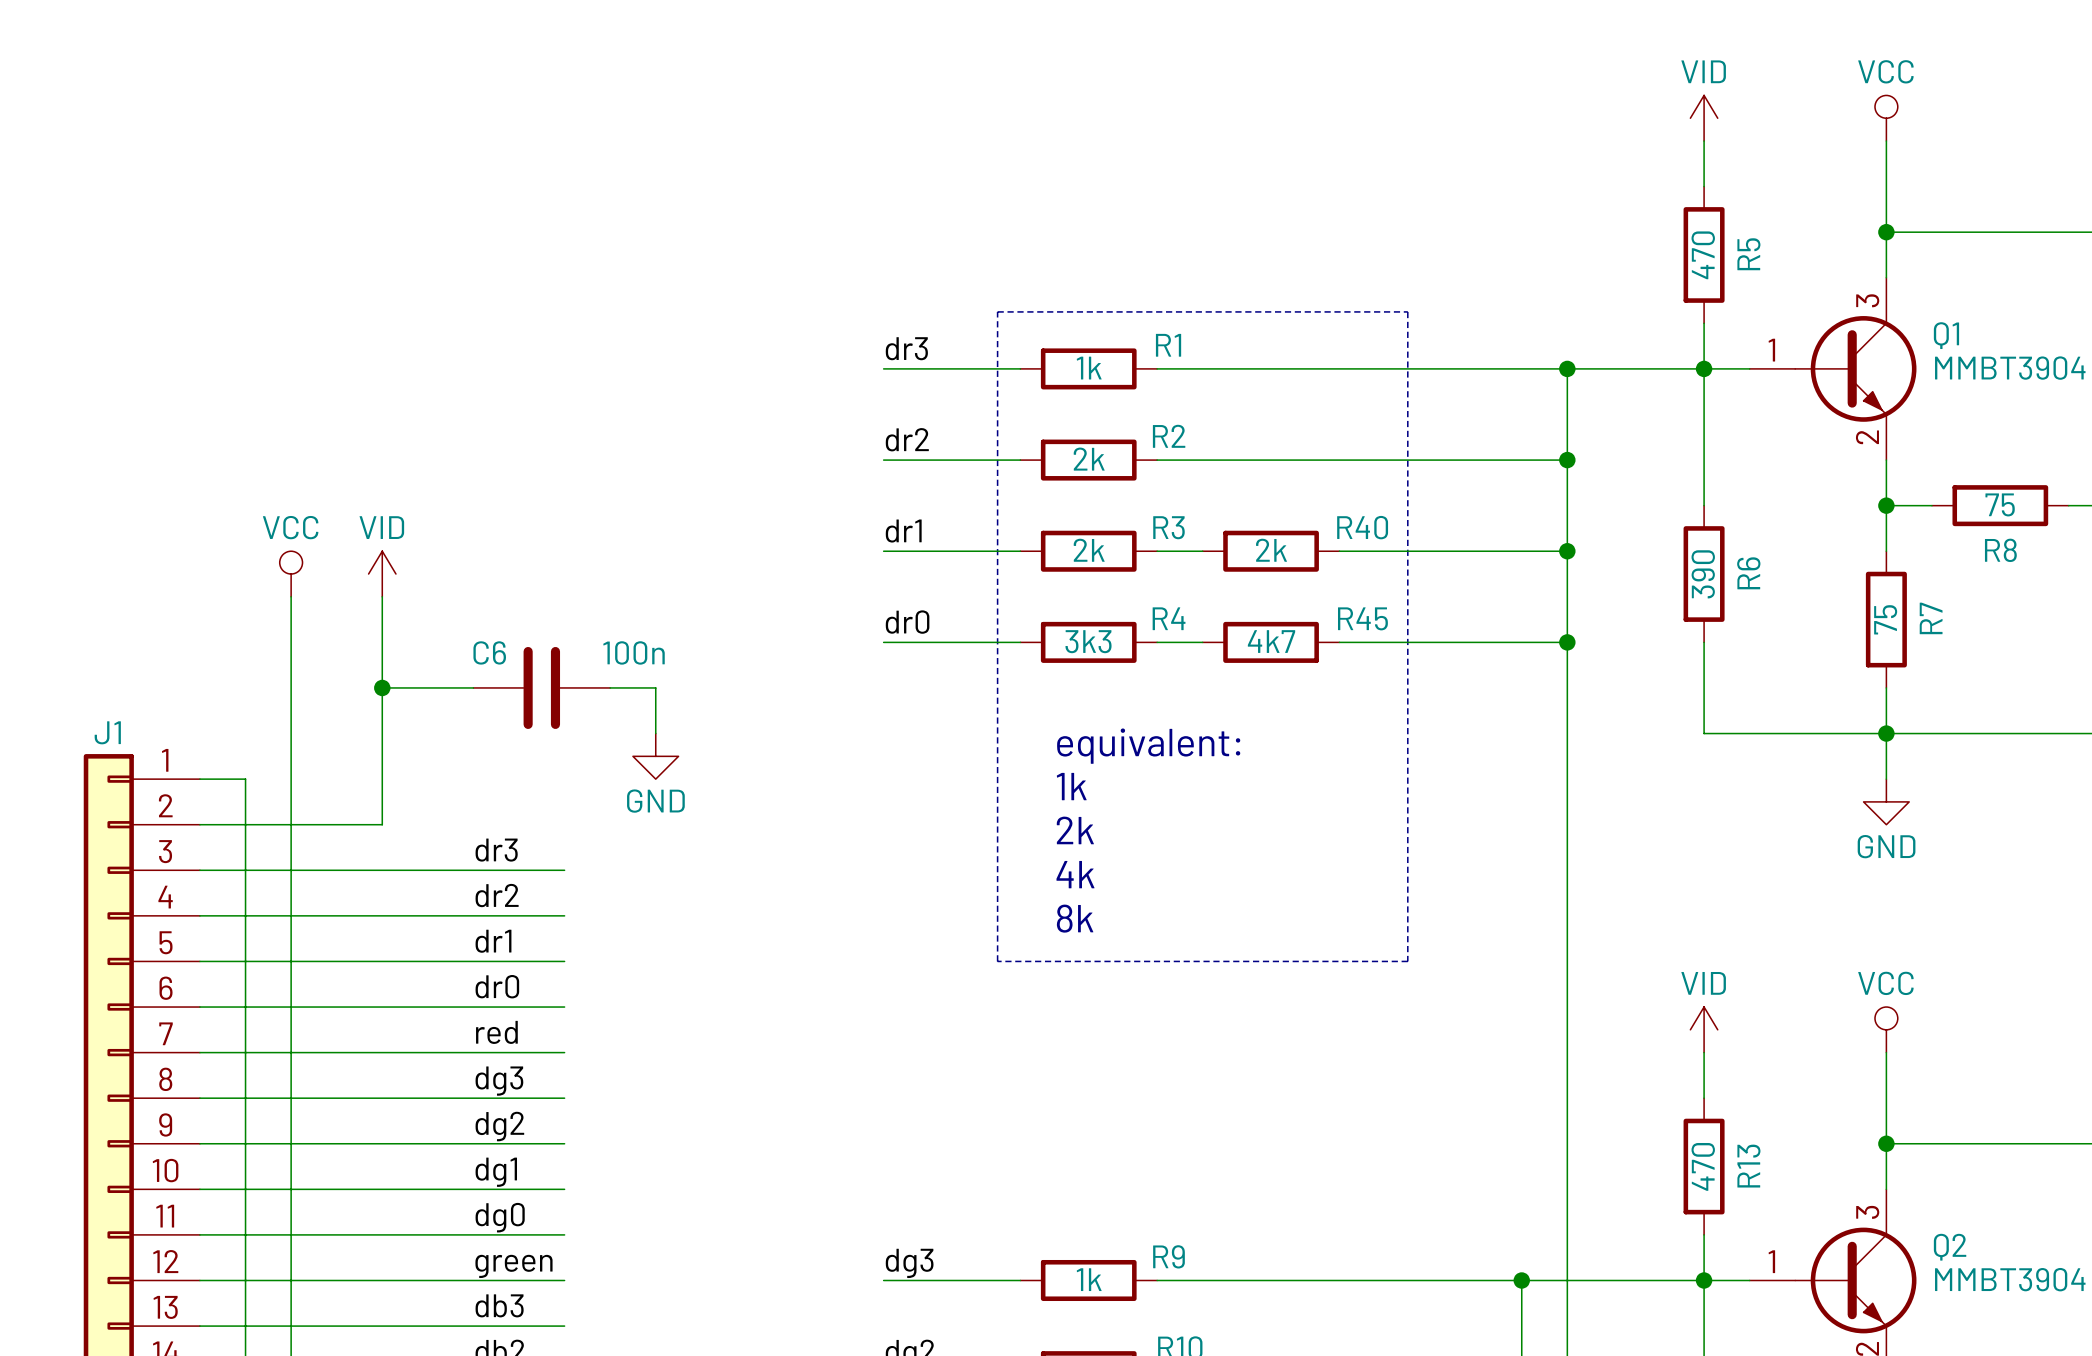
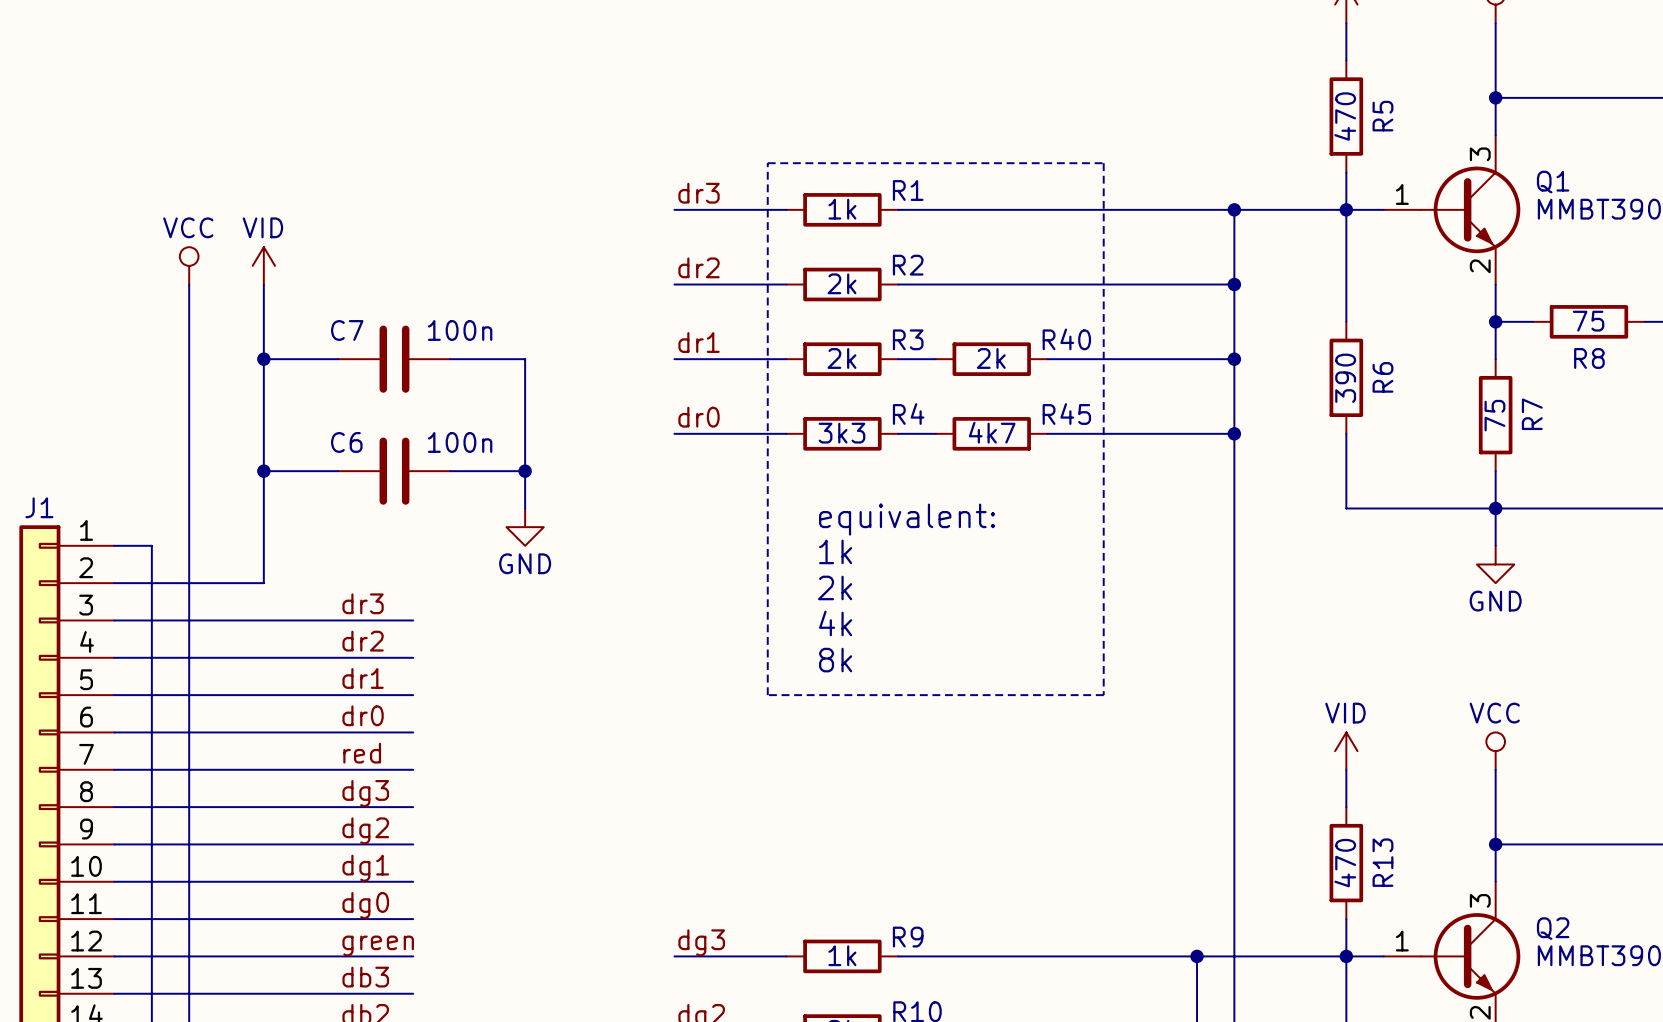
wire: none -> (189, 284) (189, 396)
wire: none -> (263, 284) (263, 396)
wire: none -> (263, 359) (338, 359)
junction: none -> (263, 359)
C7: none -> 100n (394, 359)
wire: none -> (450, 359) (525, 359) (525, 508)
power symbol position: VCC (291, 574) -> VCC (189, 265)
power symbol position: VID (382, 574) -> VID (263, 265)
wire: (655, 687) (655, 733) -> (487, 471) (525, 471)
junction: none -> (525, 471)
power symbol position: GND (655, 756) -> GND (525, 527)

